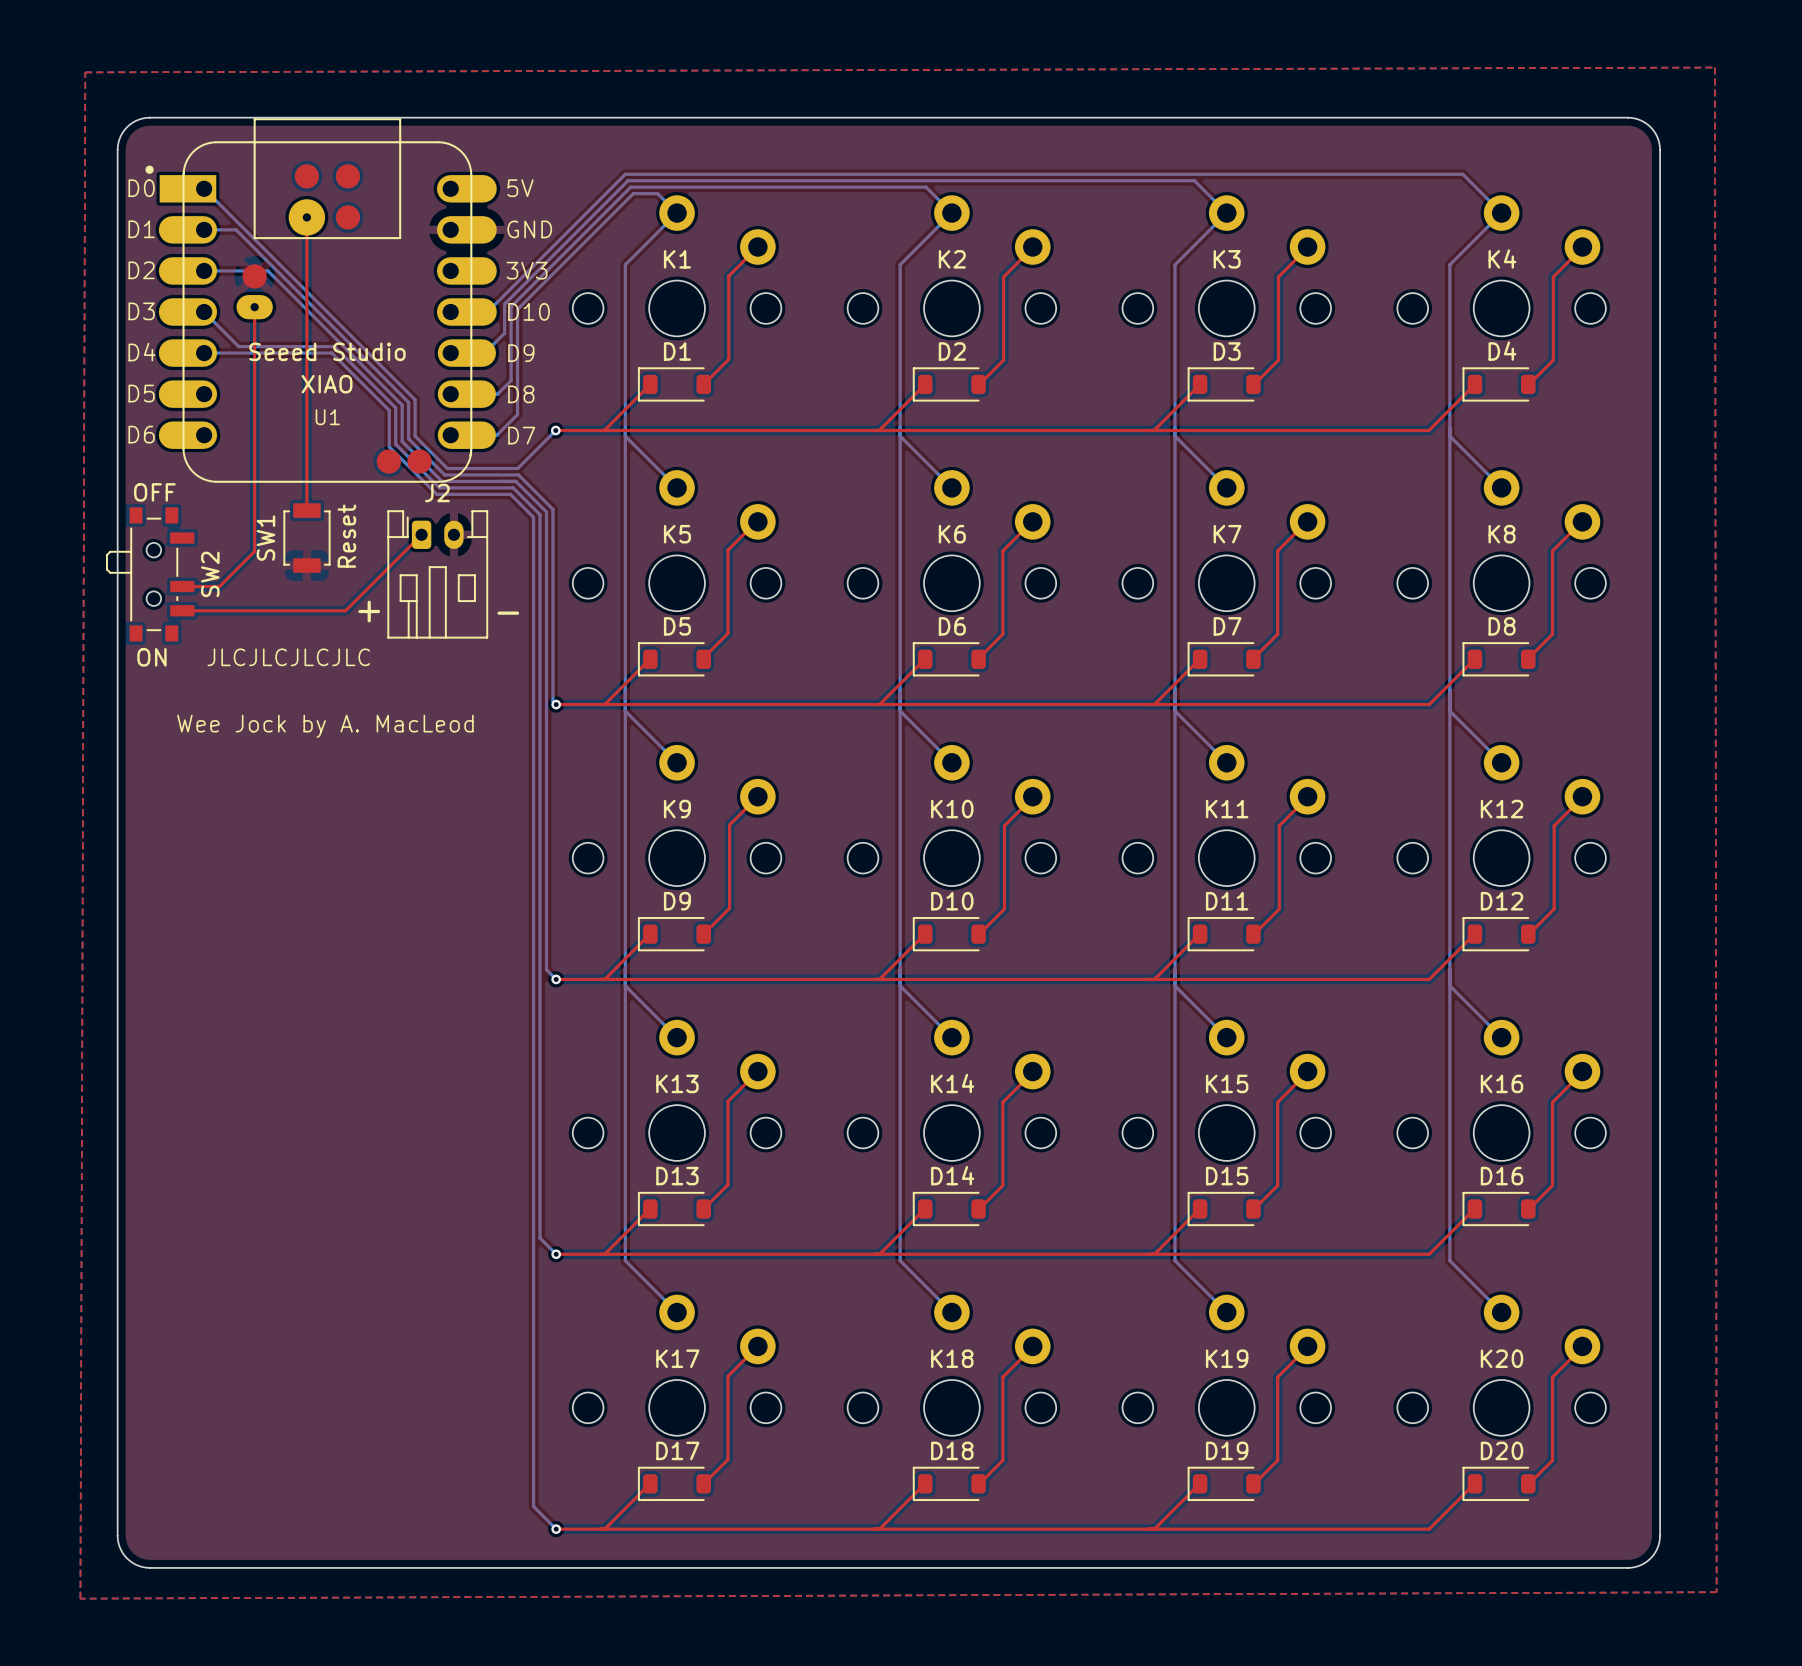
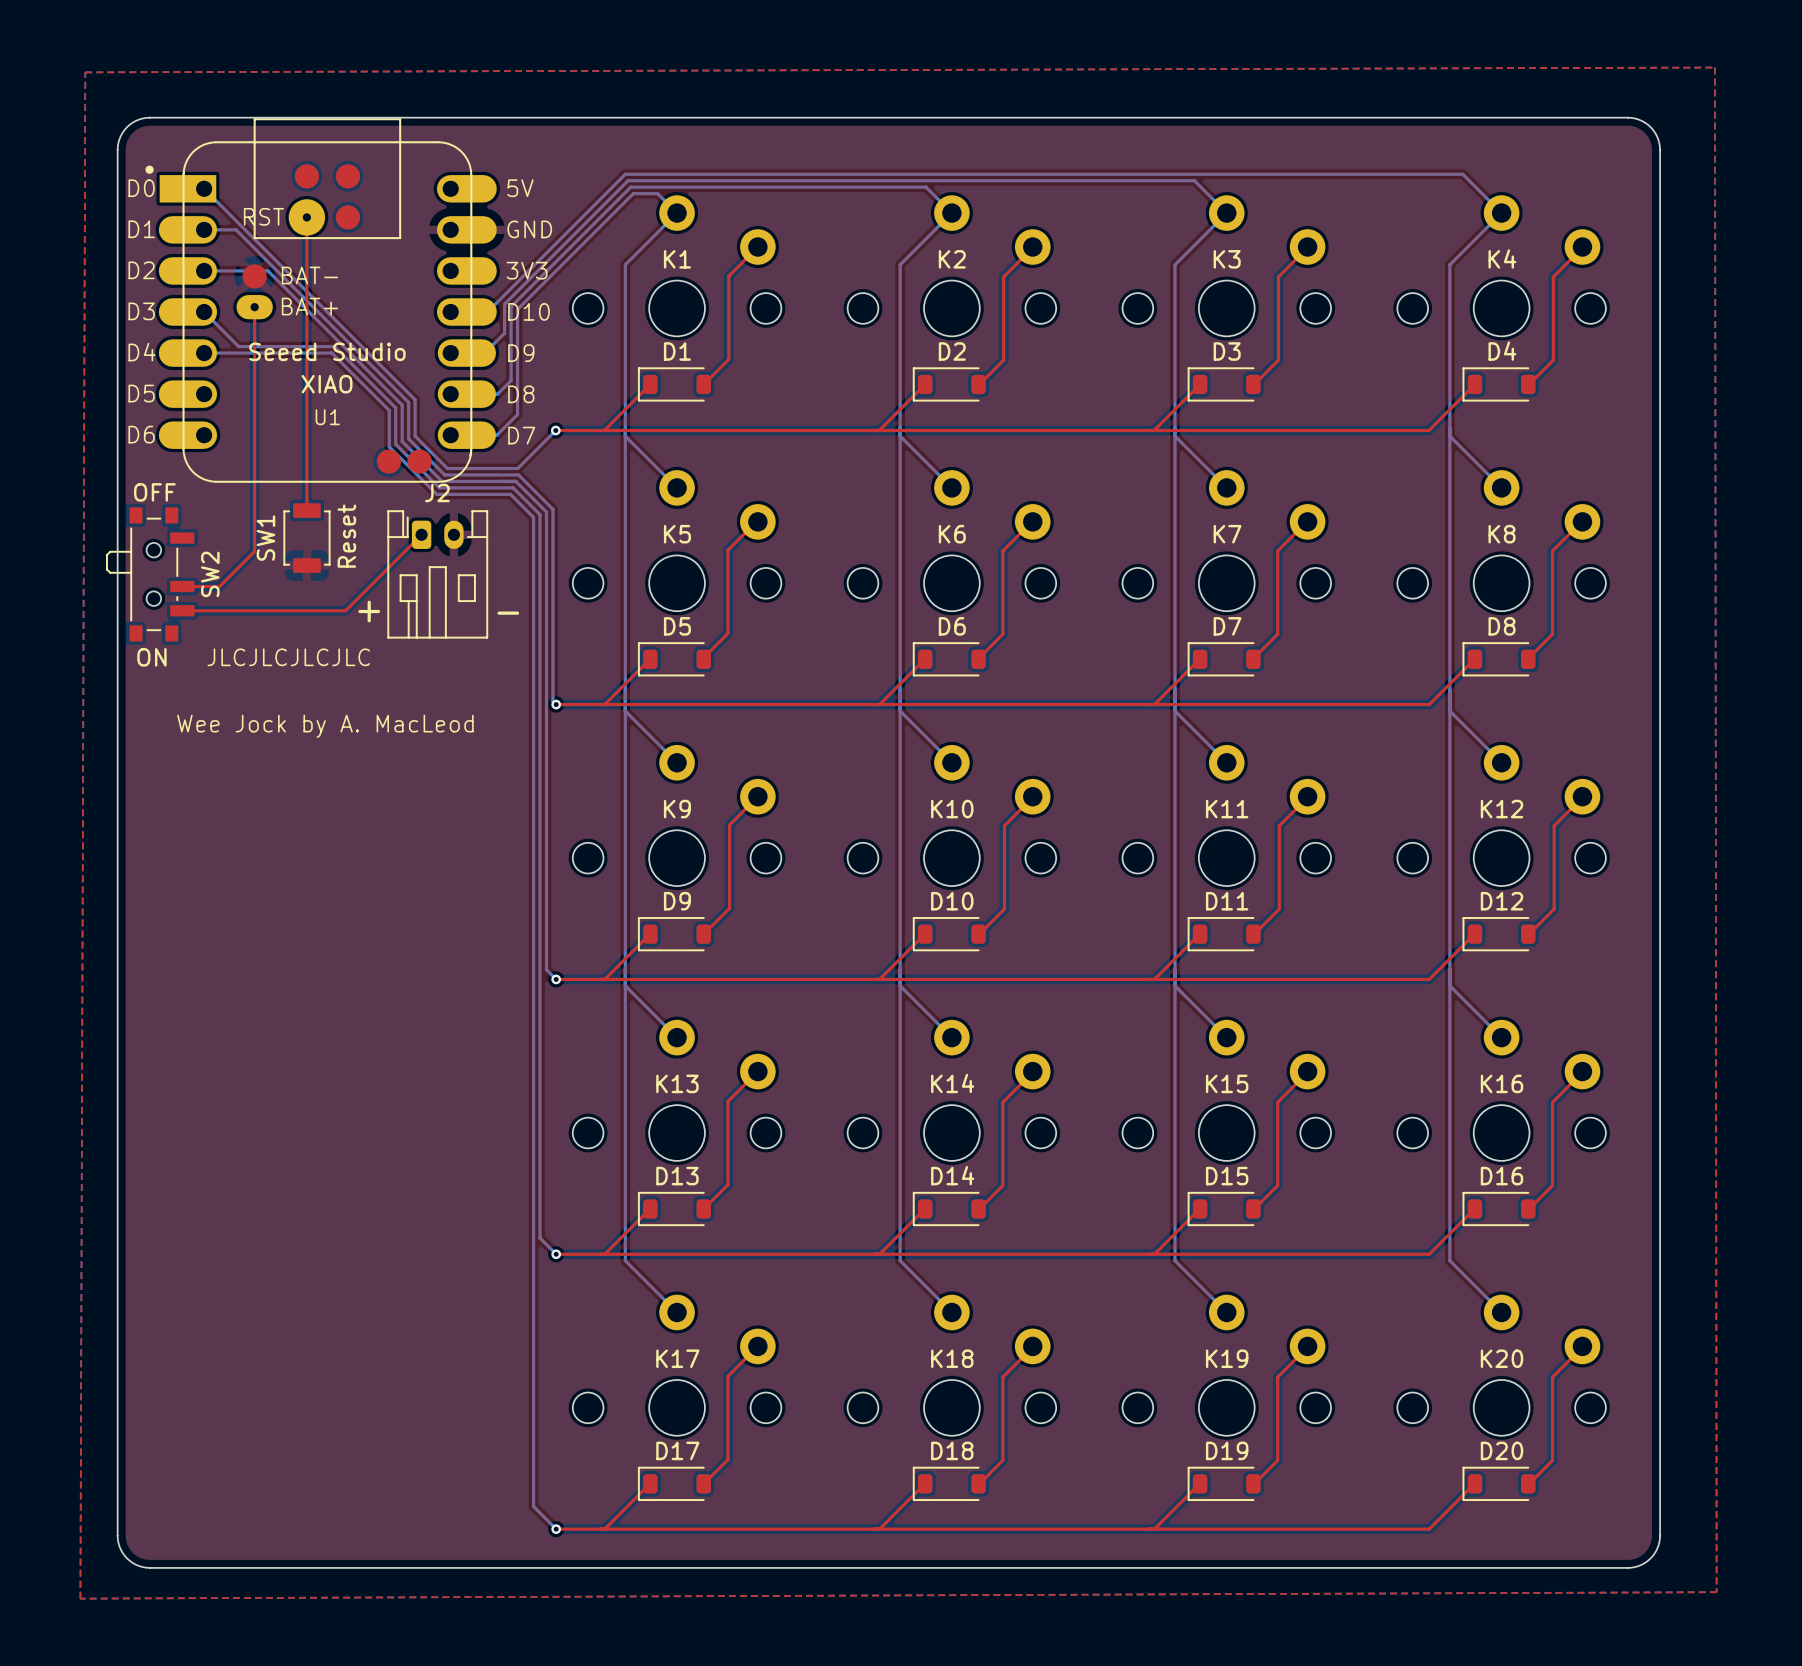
text: none -> RST (263, 216)
text: none -> BAT- (309, 275)
text: none -> BAT+ (309, 306)

